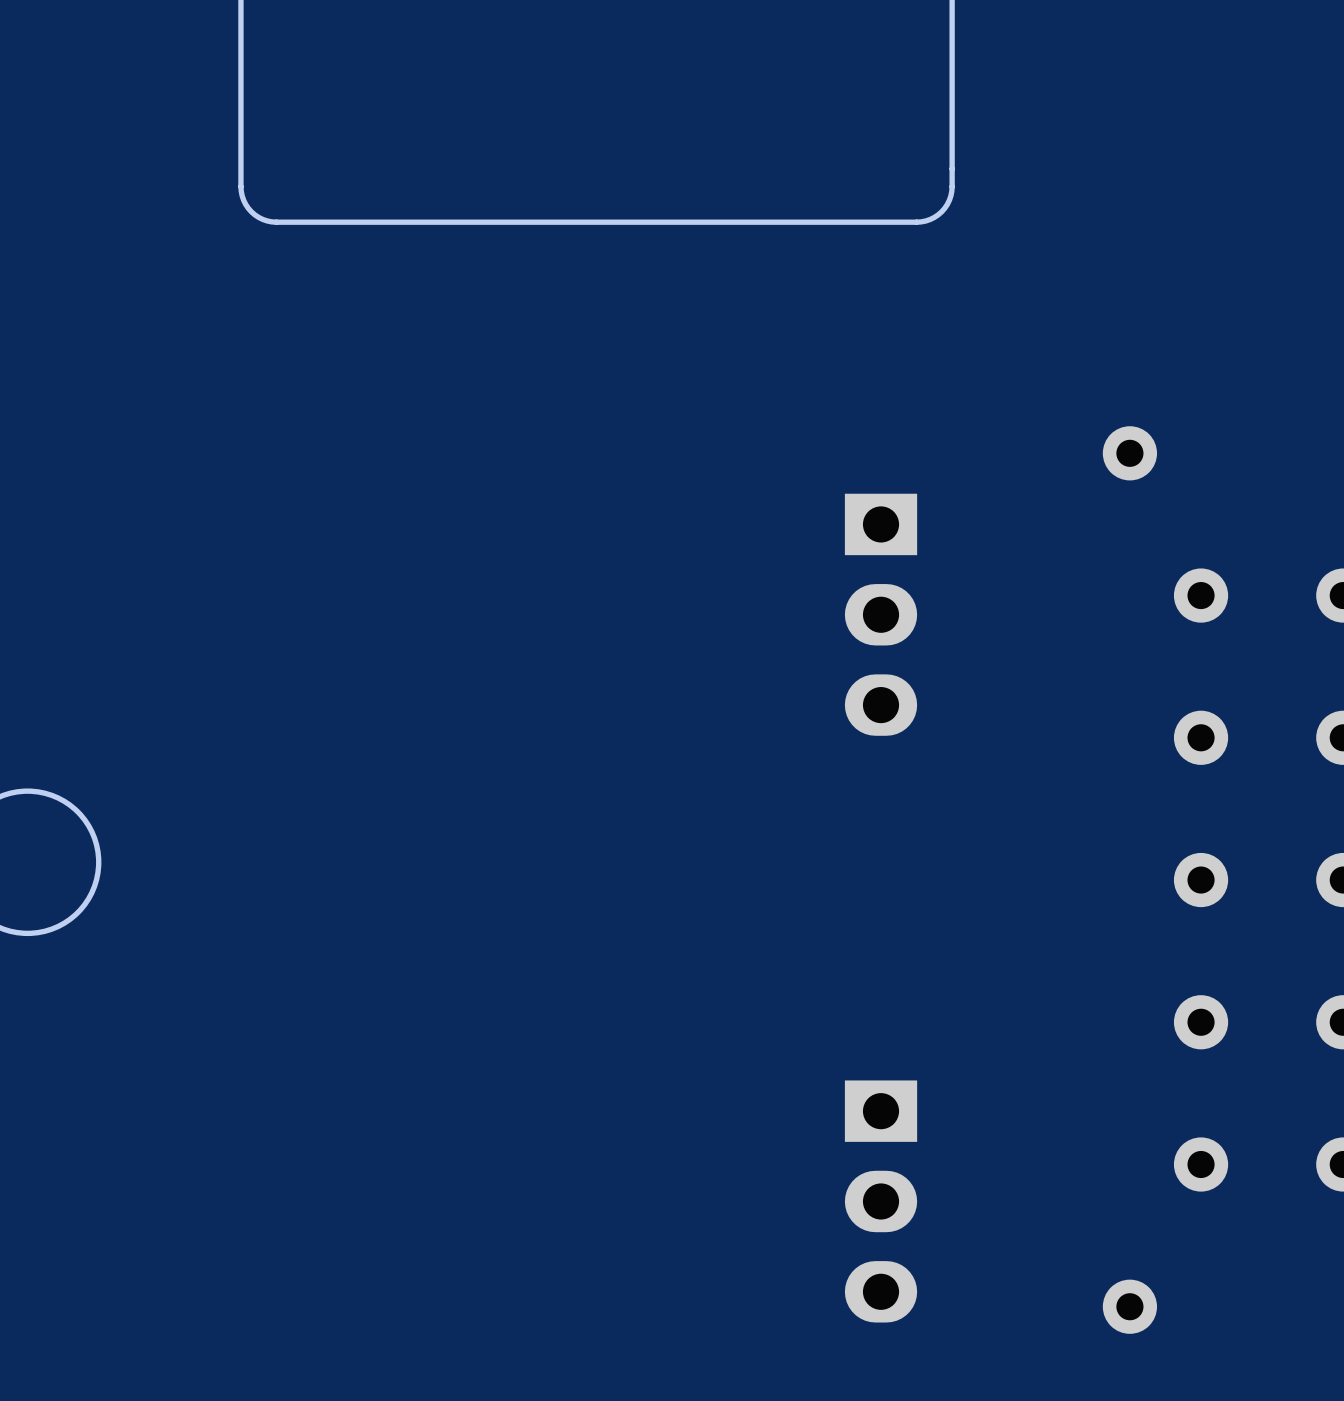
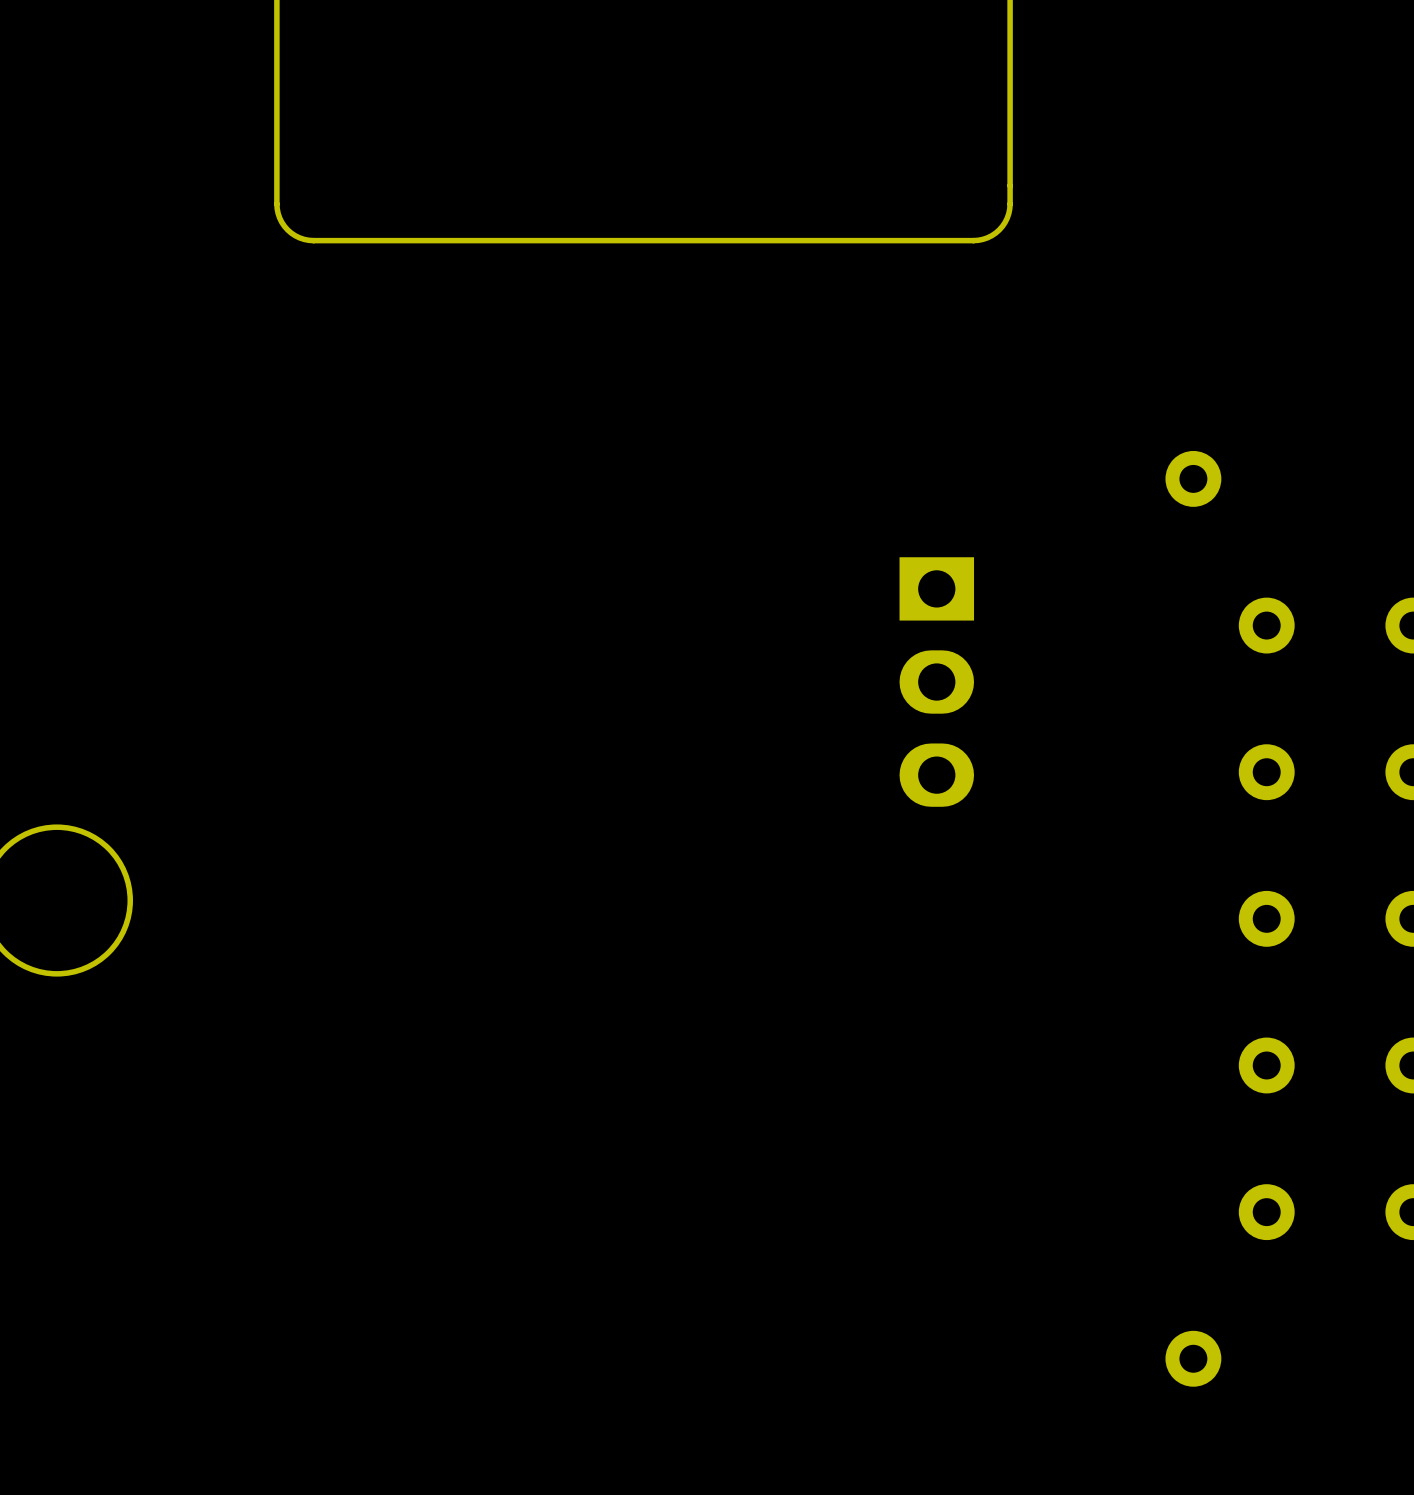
part position: (881, 614) -> (936, 682)
part: (881, 1201) -> none

